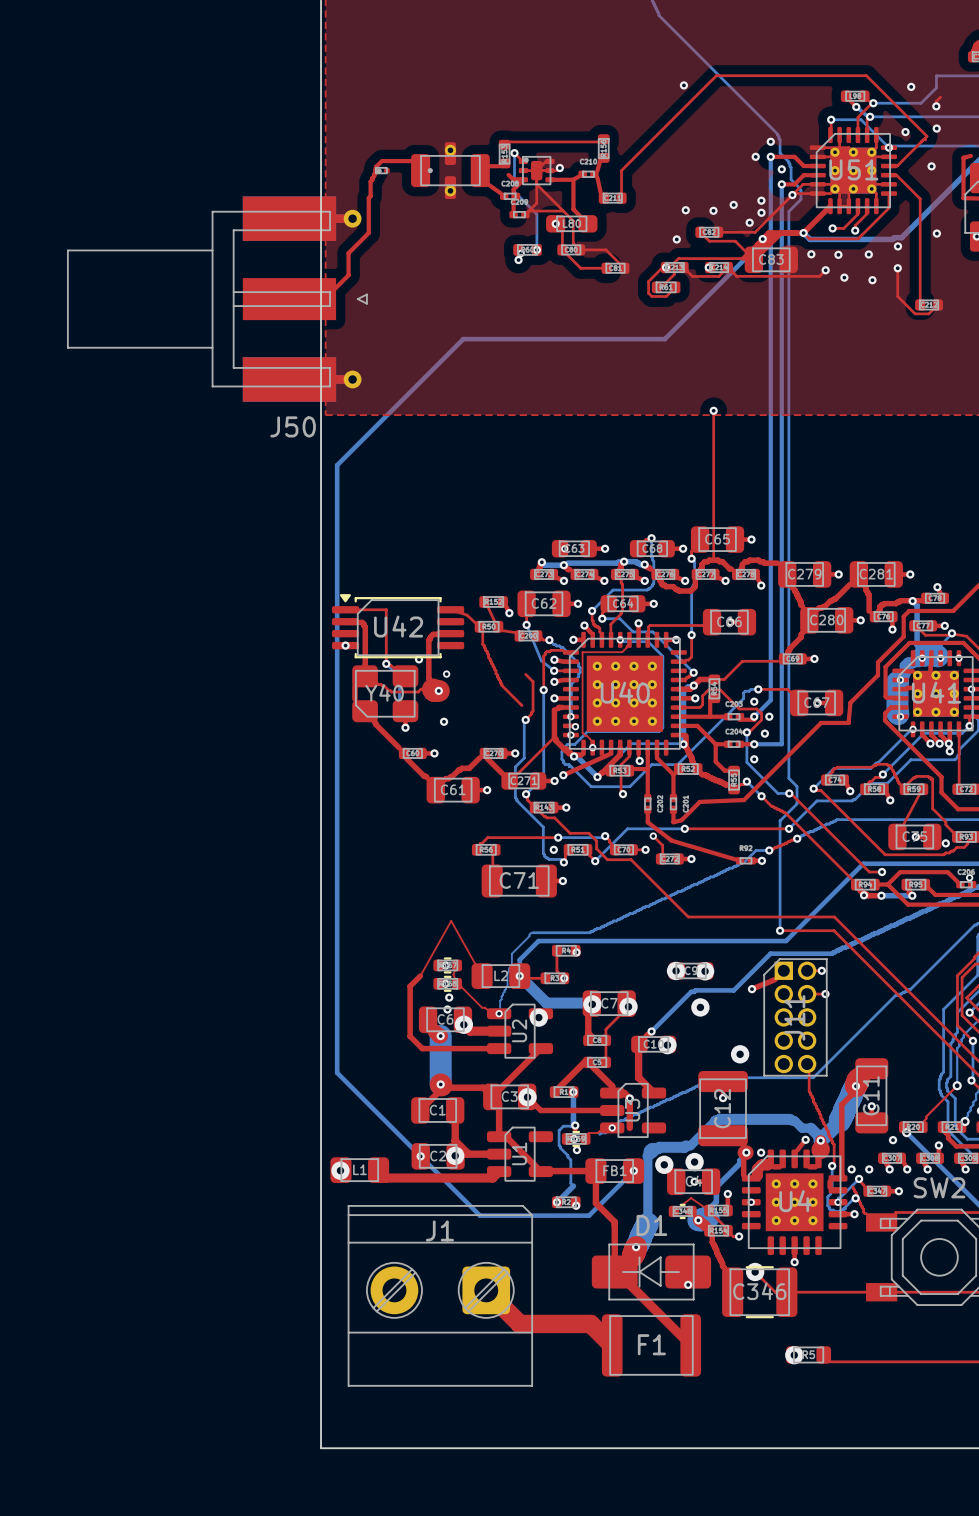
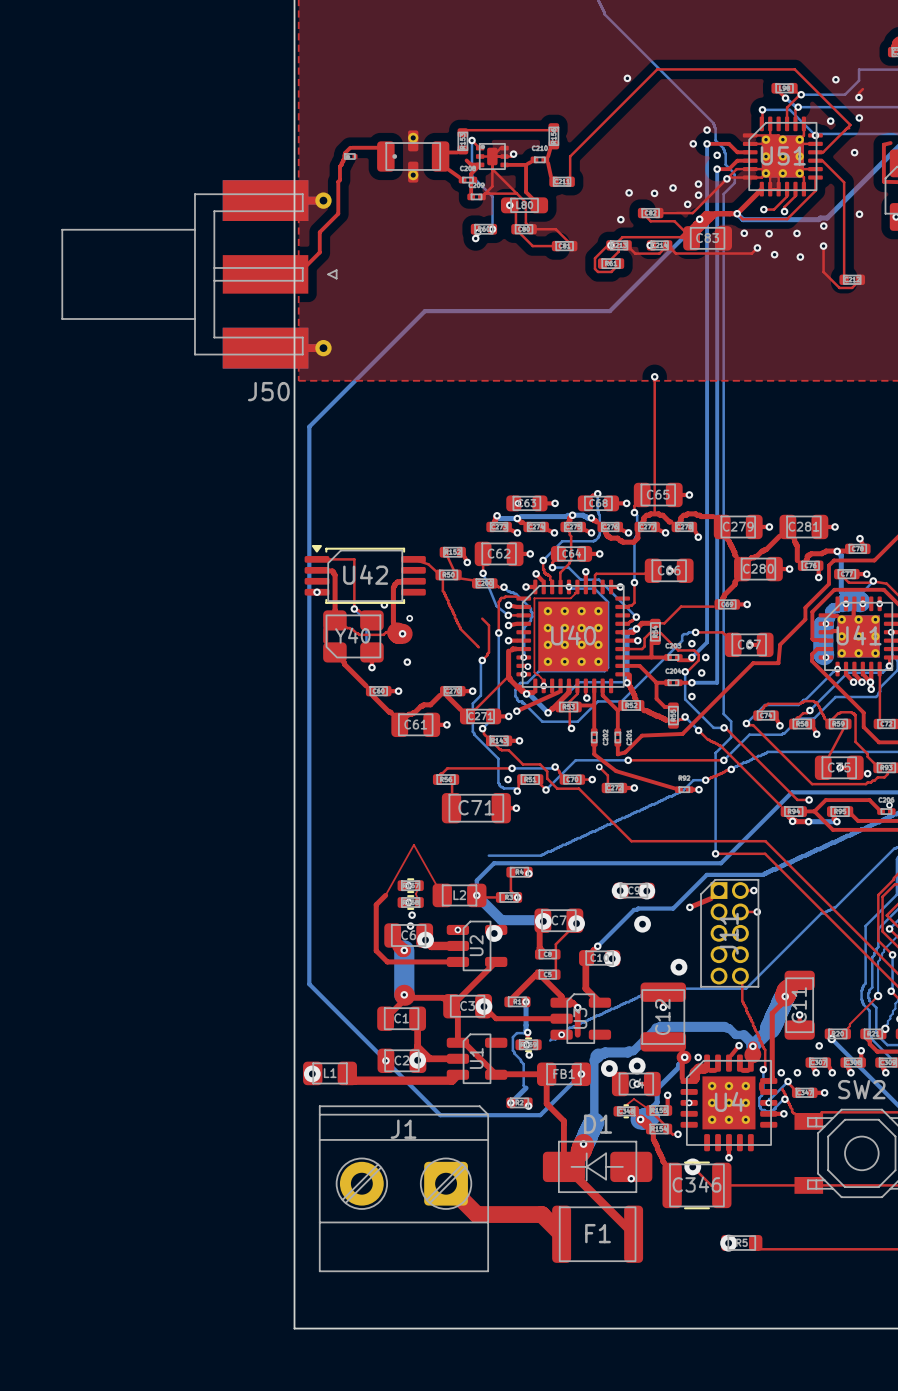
bottom track: (531, 932) (511, 953) (511, 965) (507, 972) (507, 986) (500, 1000) (499, 1010) -> none
top track: (461, 987) (482, 1007) (487, 1009) -> none
top track: (600, 1131) (588, 1133) -> none

